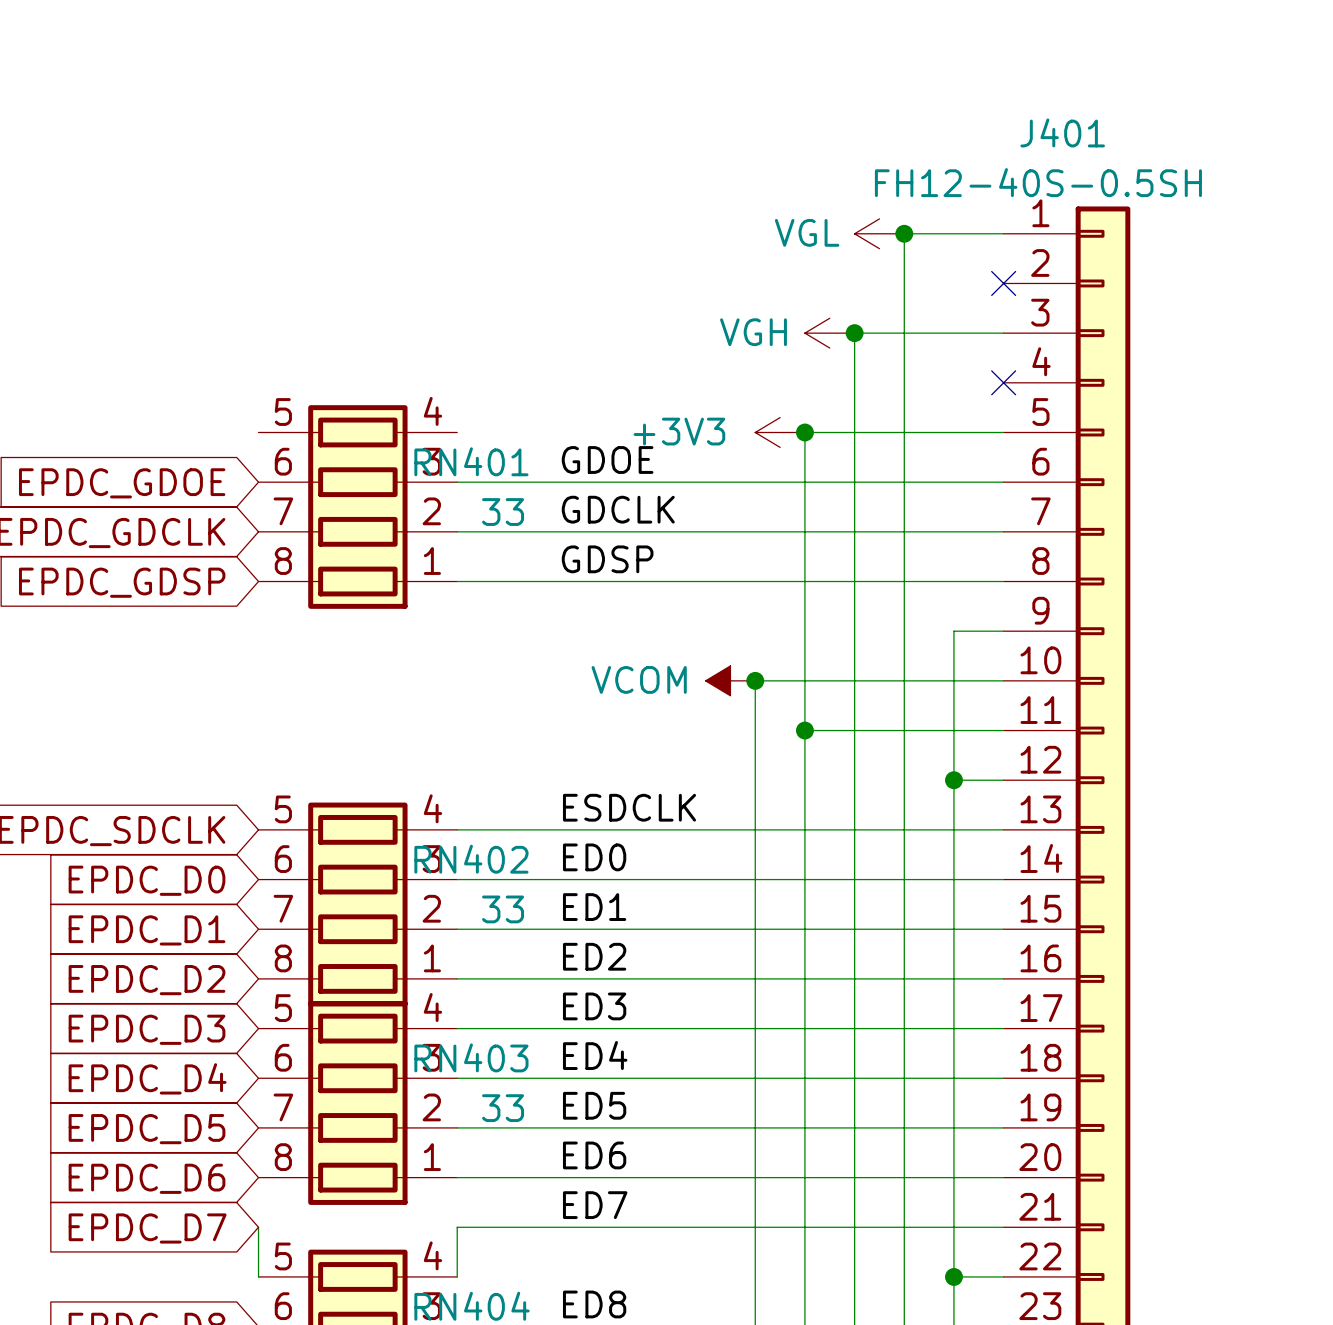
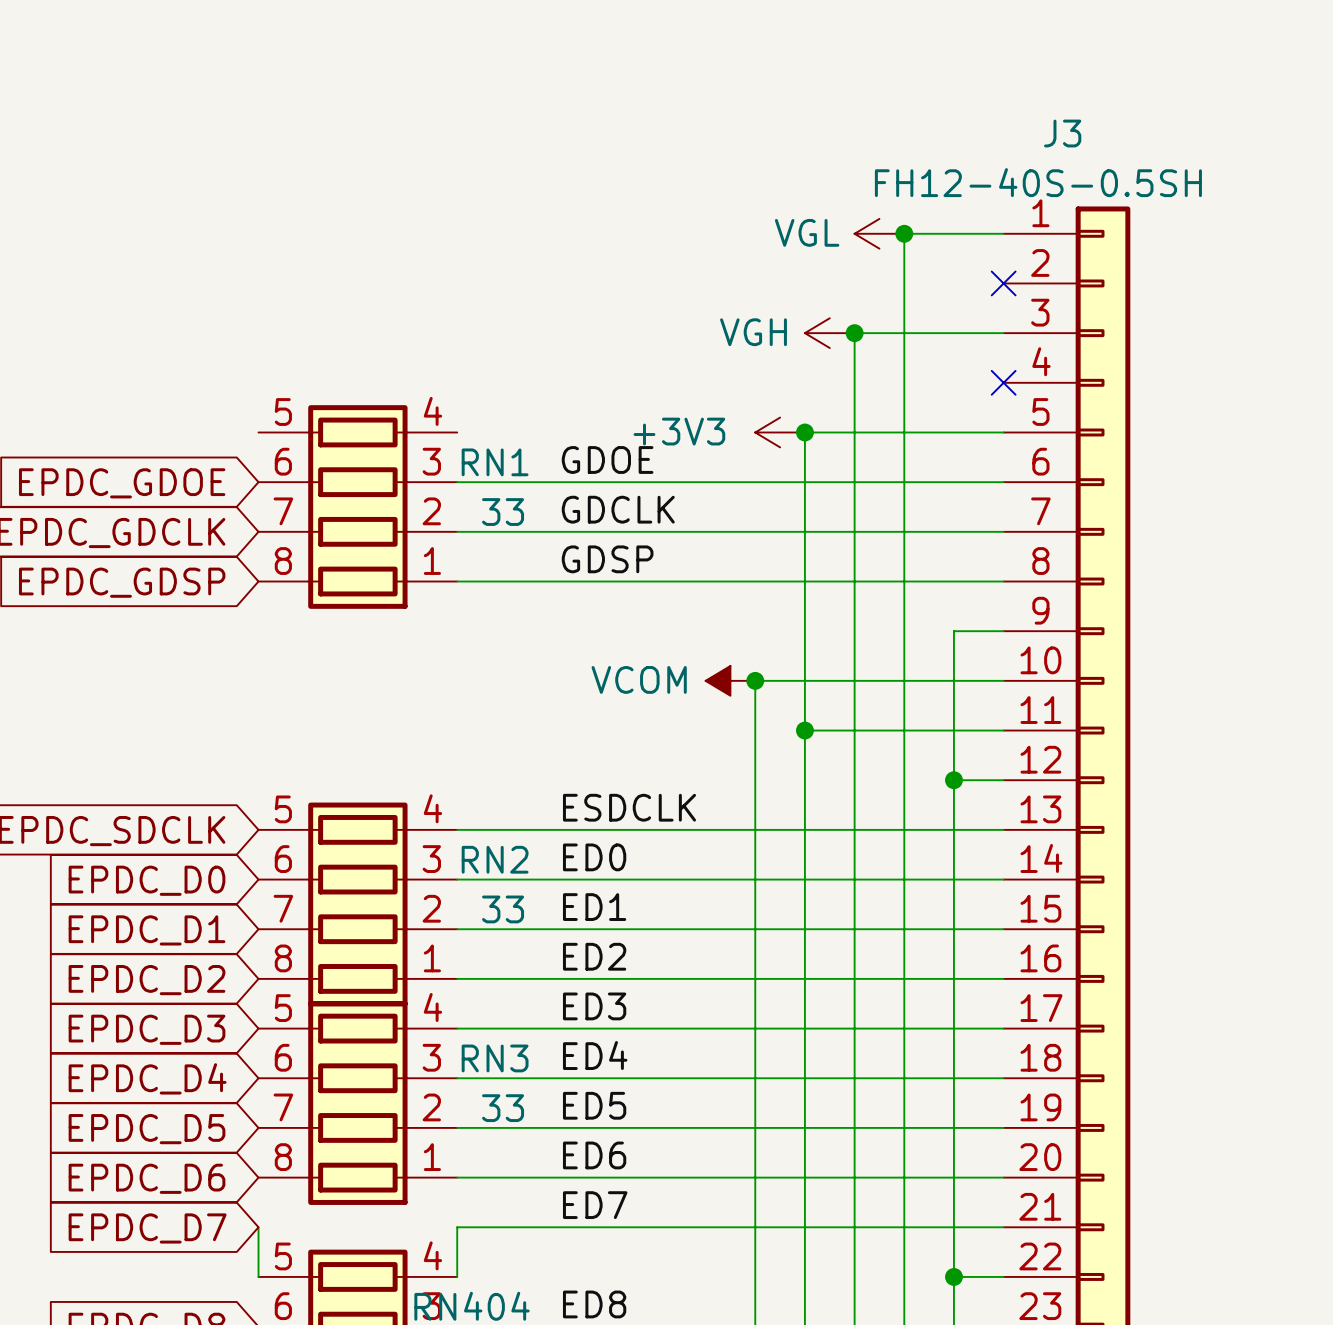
J401 name: J401 (1062, 132) -> J3 (1062, 133)
RN401 name: RN401 (471, 461) -> RN1 (495, 462)
RN402 name: RN402 (471, 859) -> RN2 (495, 859)
RN403 name: RN403 (471, 1057) -> RN3 (495, 1058)

